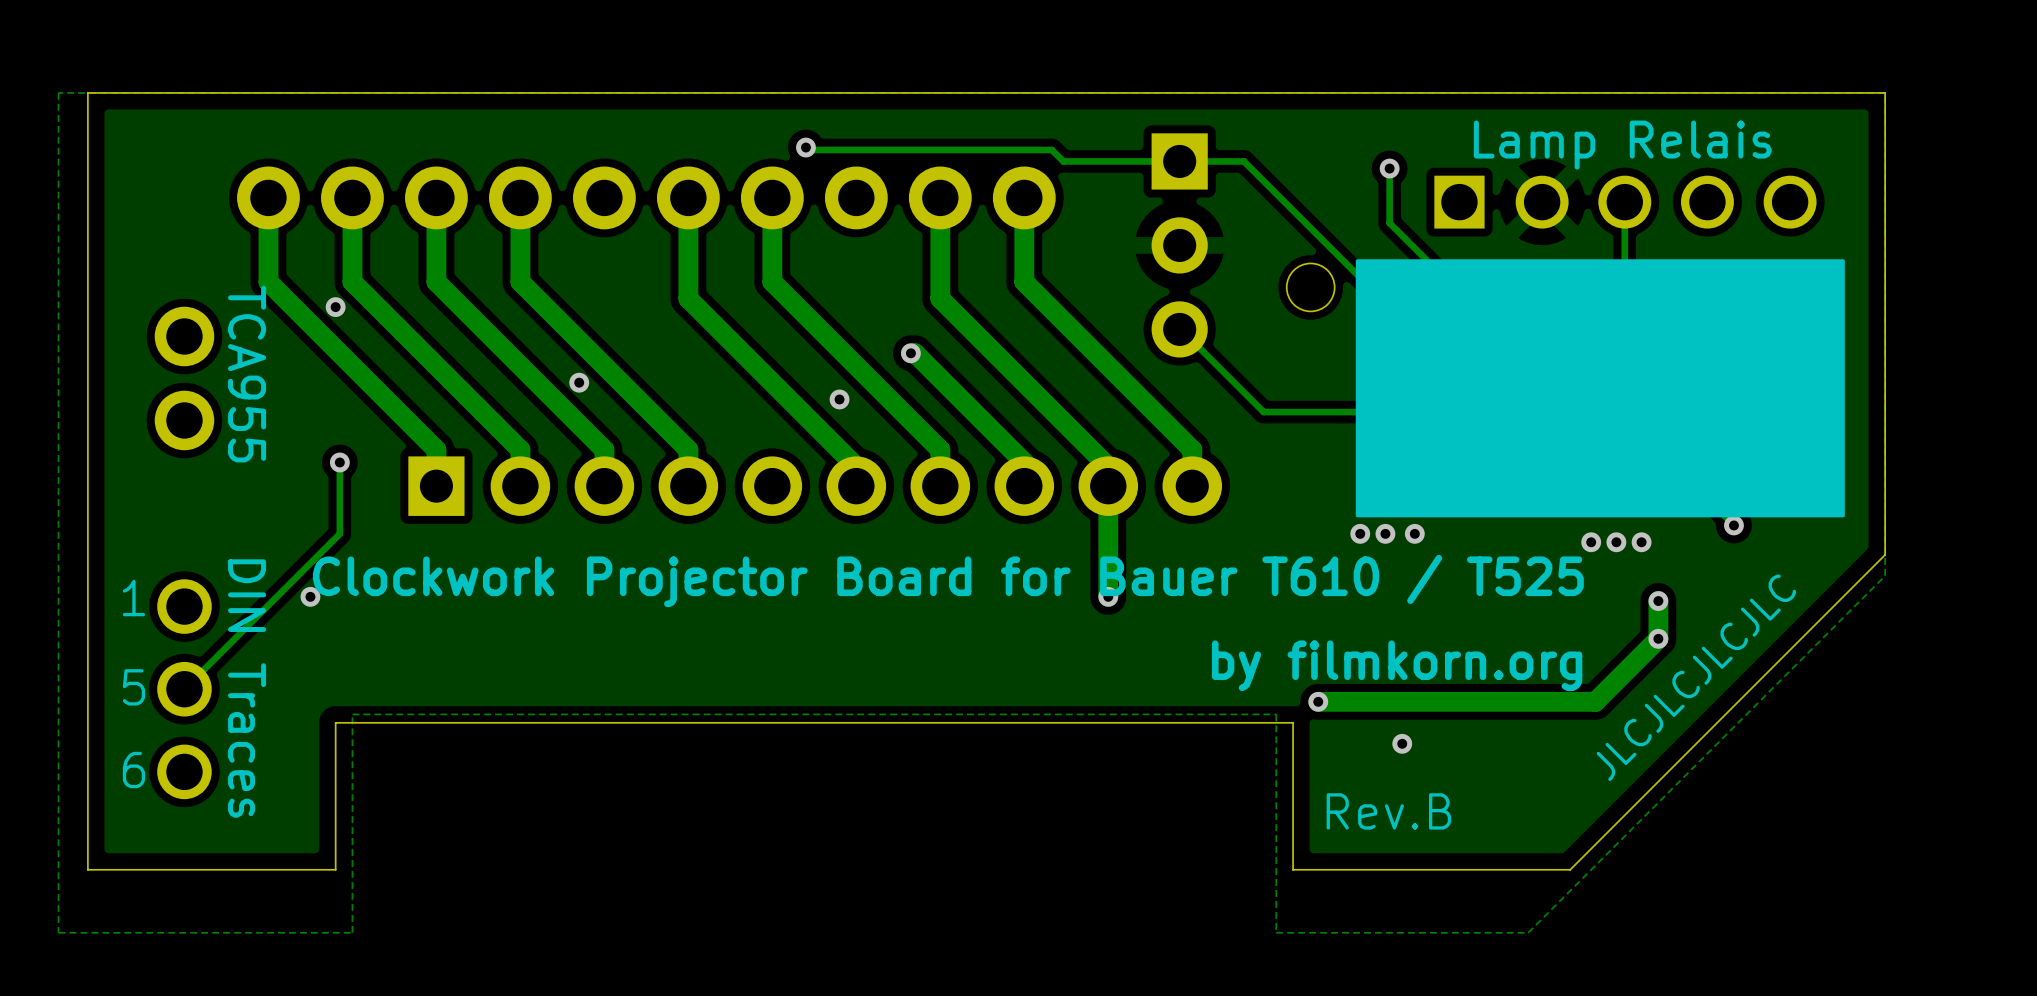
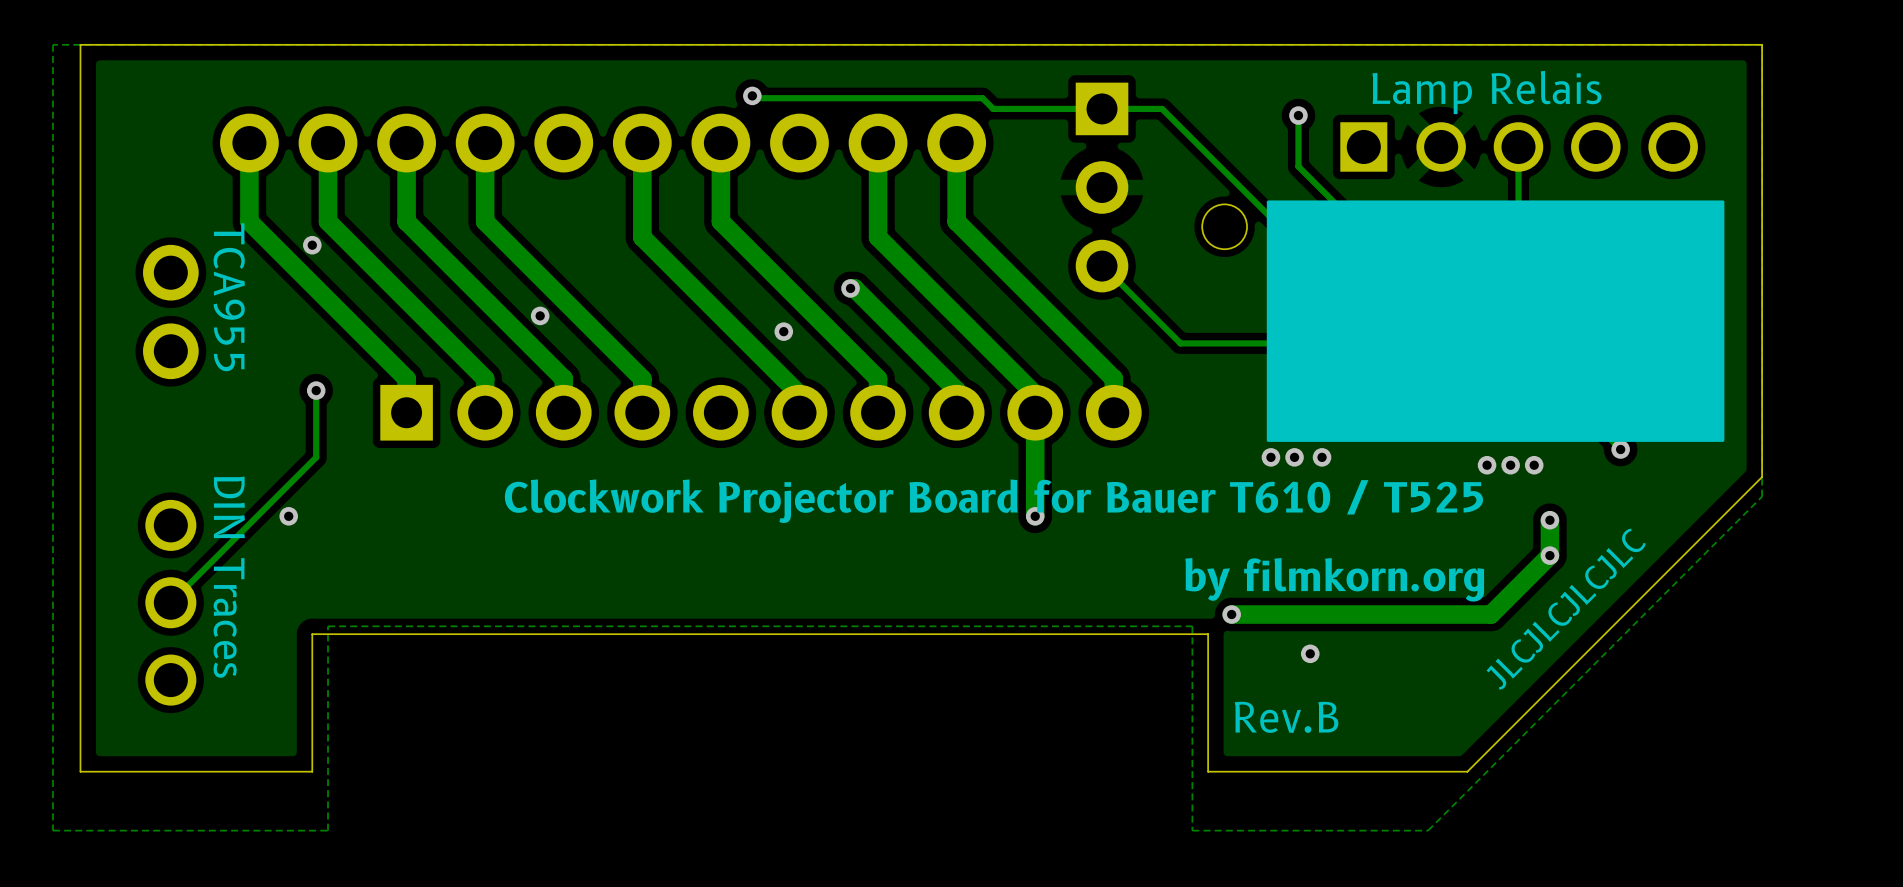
text: 1 (133, 598) -> none
text: 5 (133, 687) -> none
text: 6 (133, 770) -> none

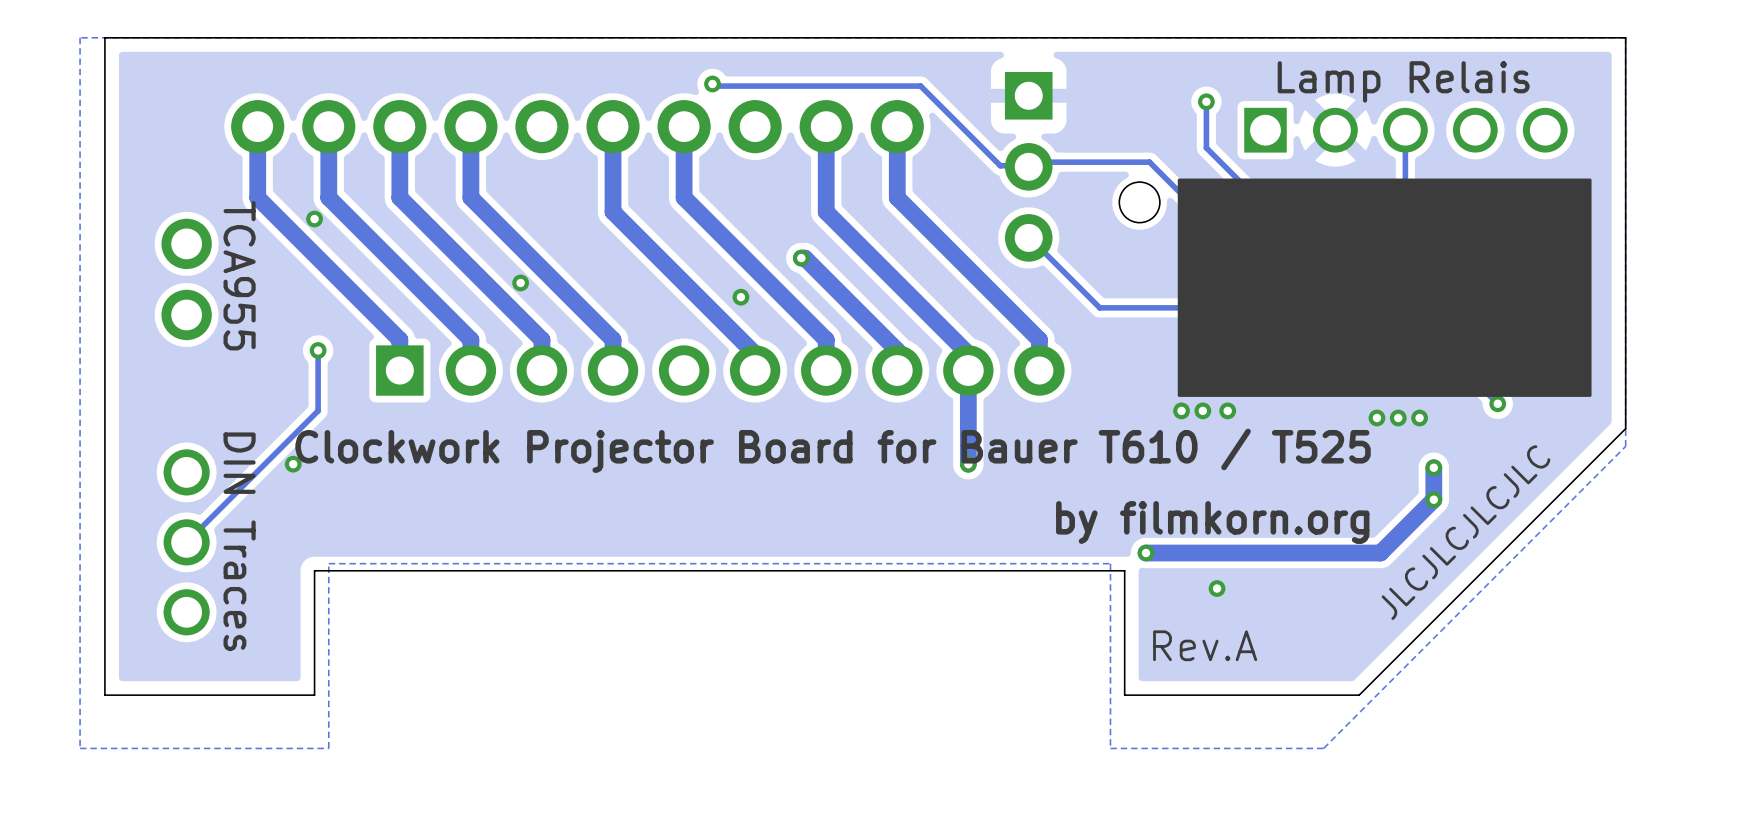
track: (993, 108) (1162, 108) (1235, 182) -> (930, 95) (1000, 165) (1028, 165)
track: none -> (1149, 162) (1032, 162)
text: Rev.B (1286, 717) -> Rev.A (1205, 645)

